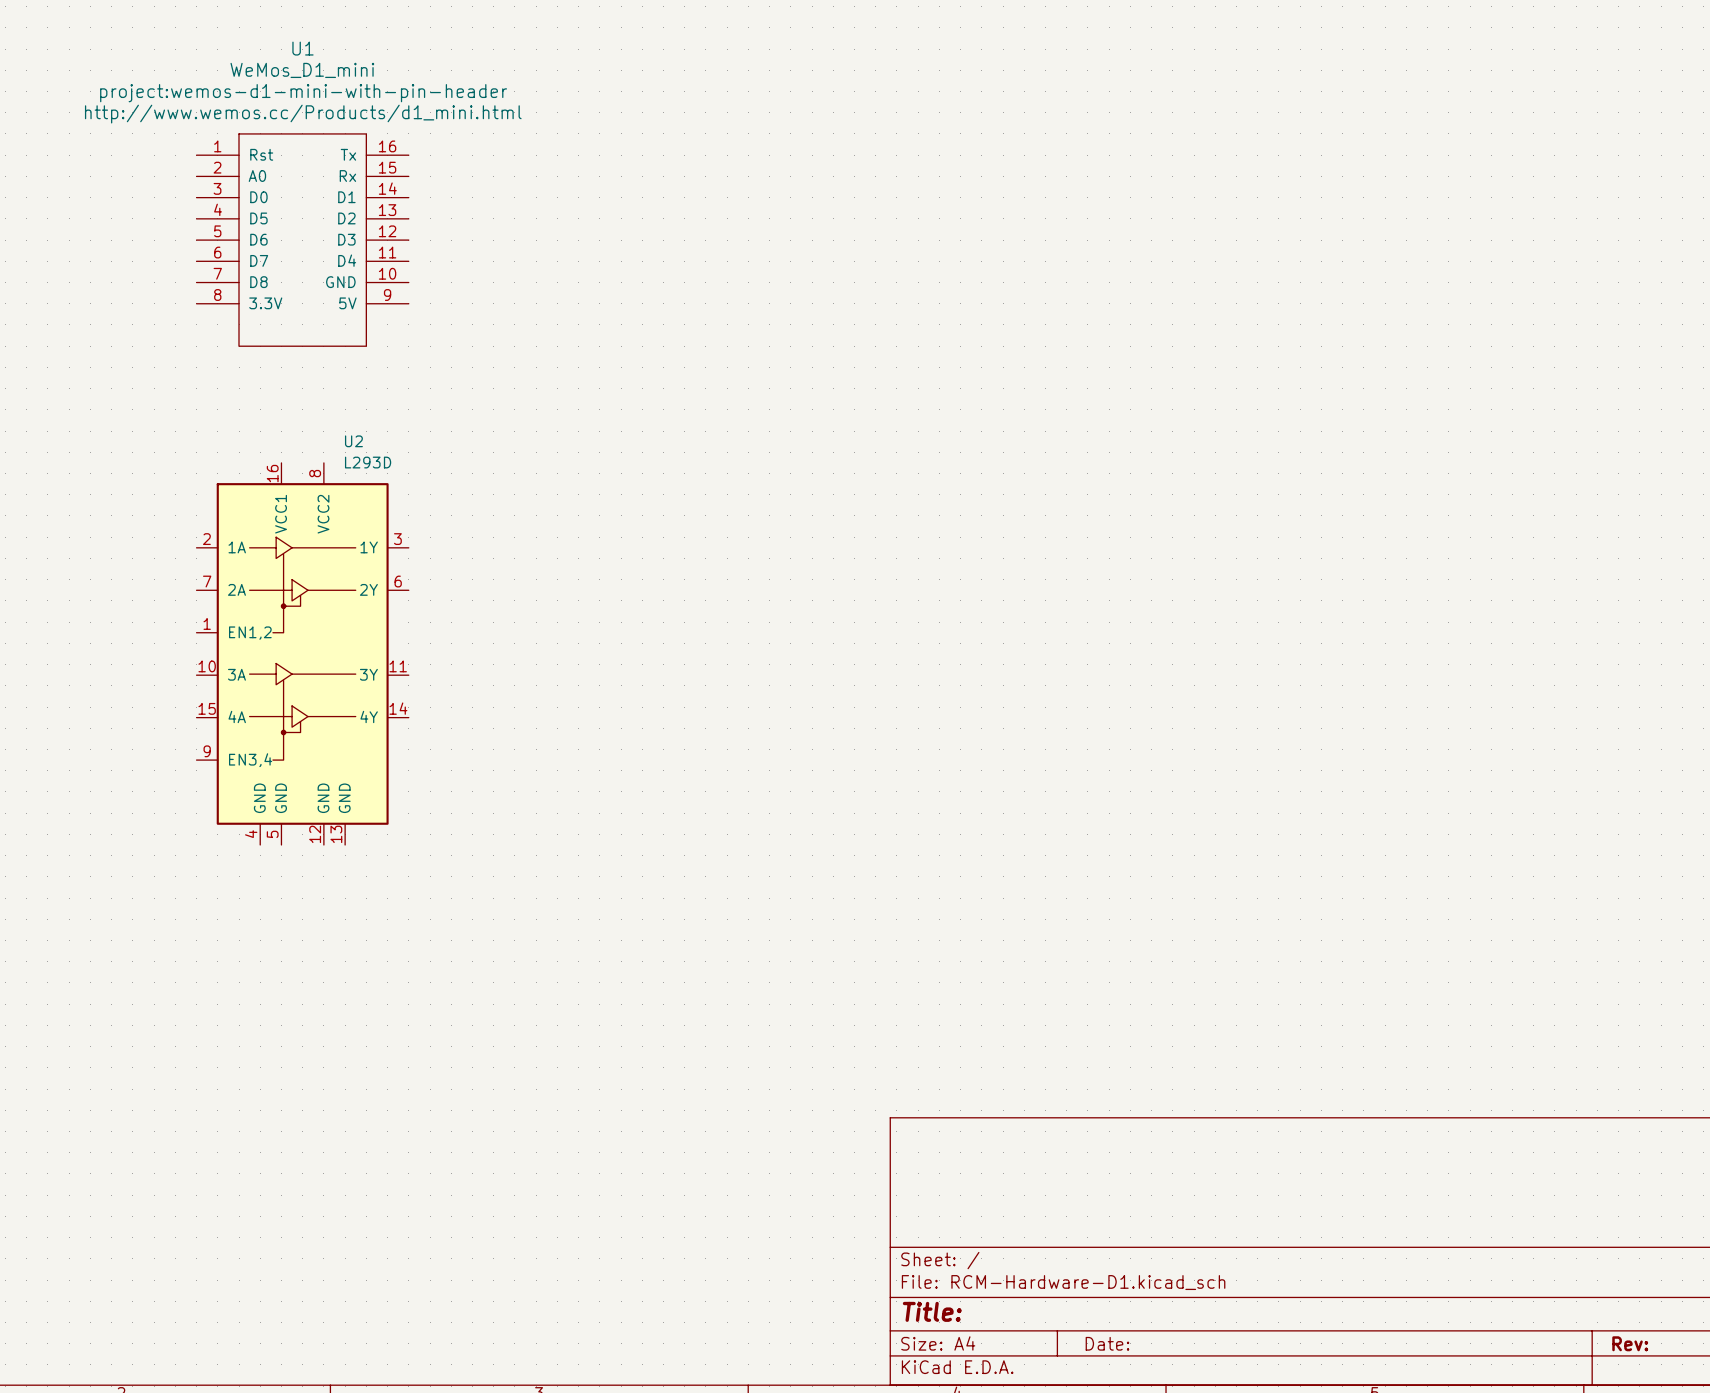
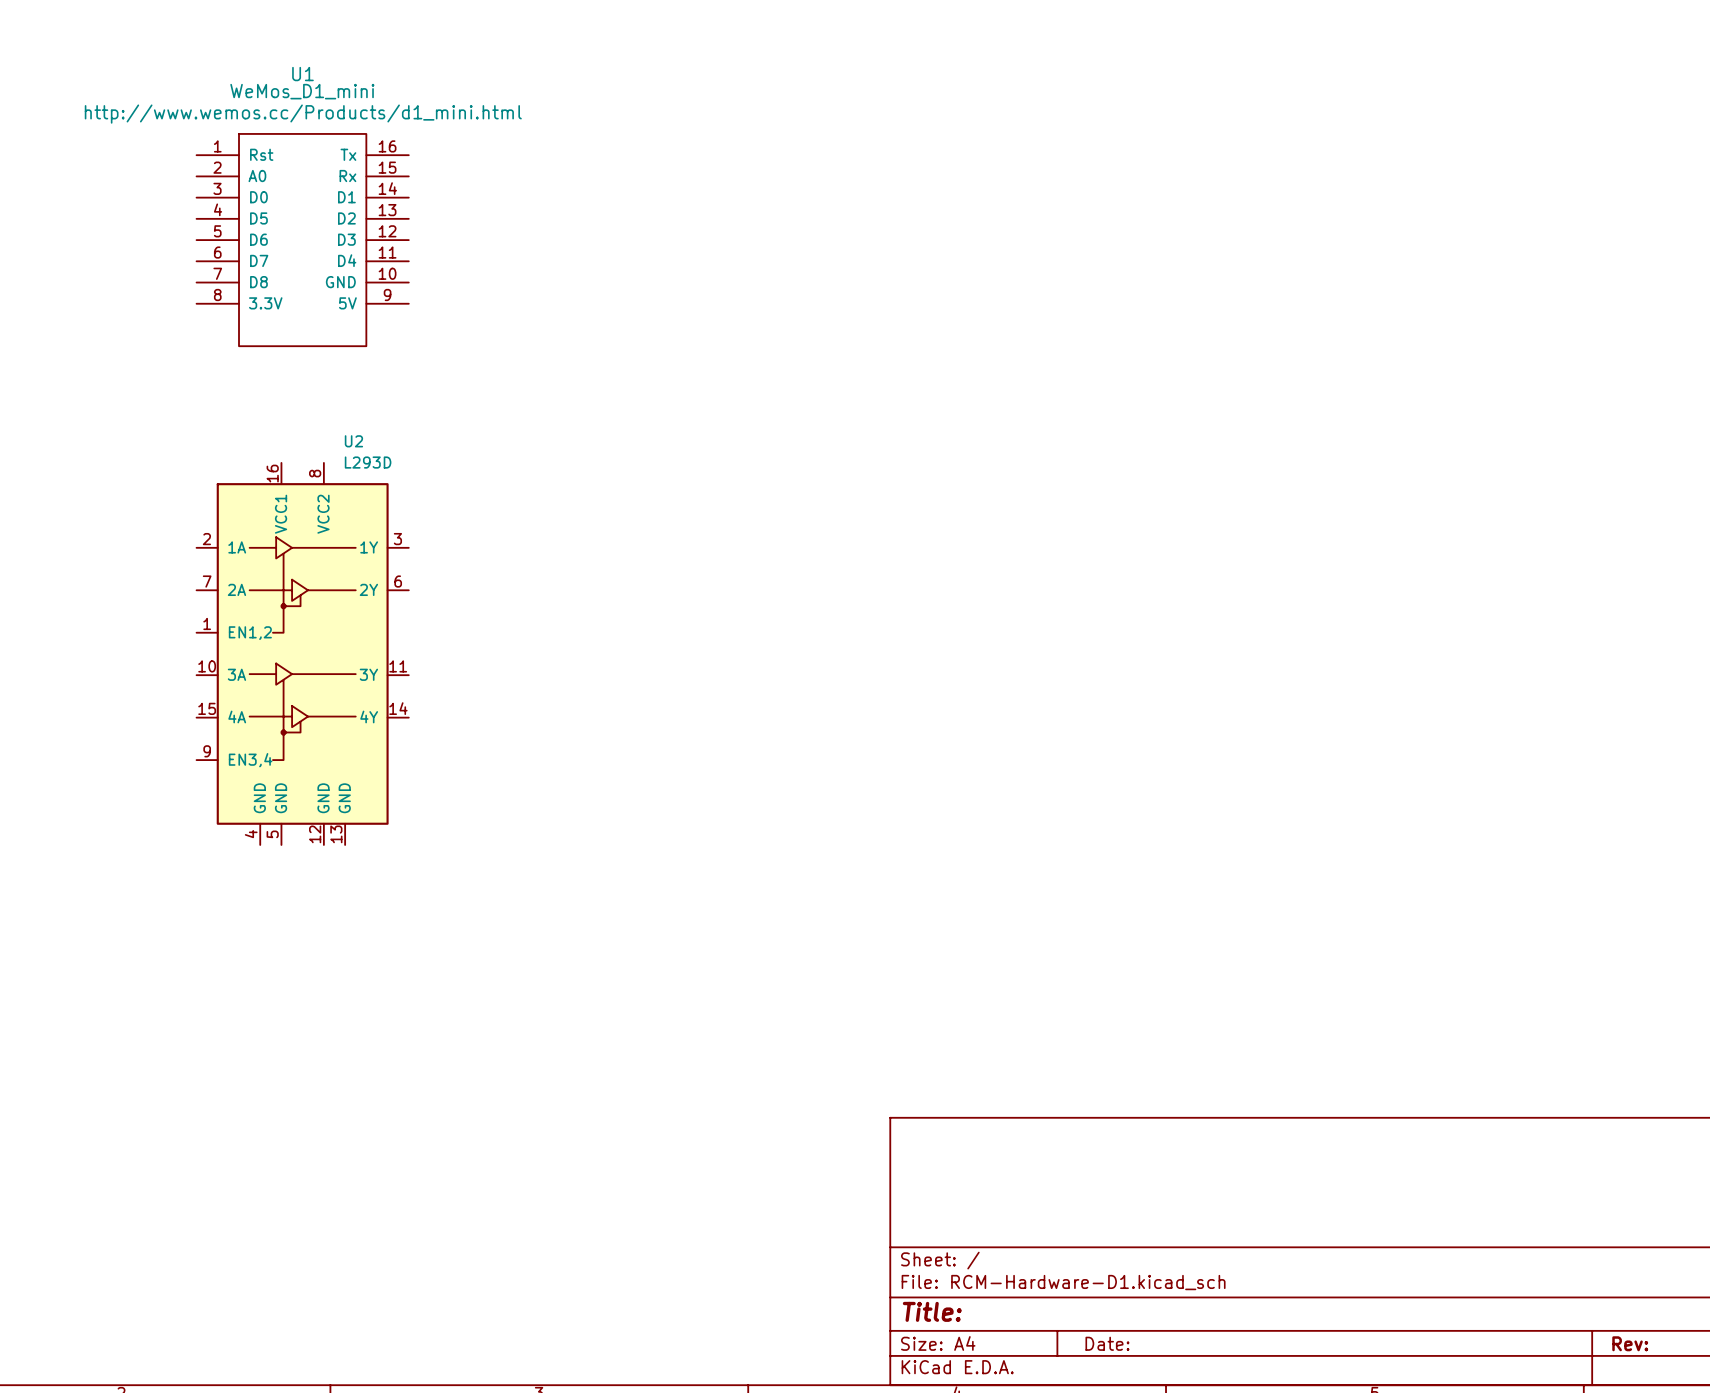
U1 name position: U1 (302, 48) -> U1 (302, 74)
U1 value position: WeMos_D1_mini (302, 70) -> WeMos_D1_mini (302, 91)
U1 text: project:wemos-d1-mini-with-pin-header (303, 93) -> none

